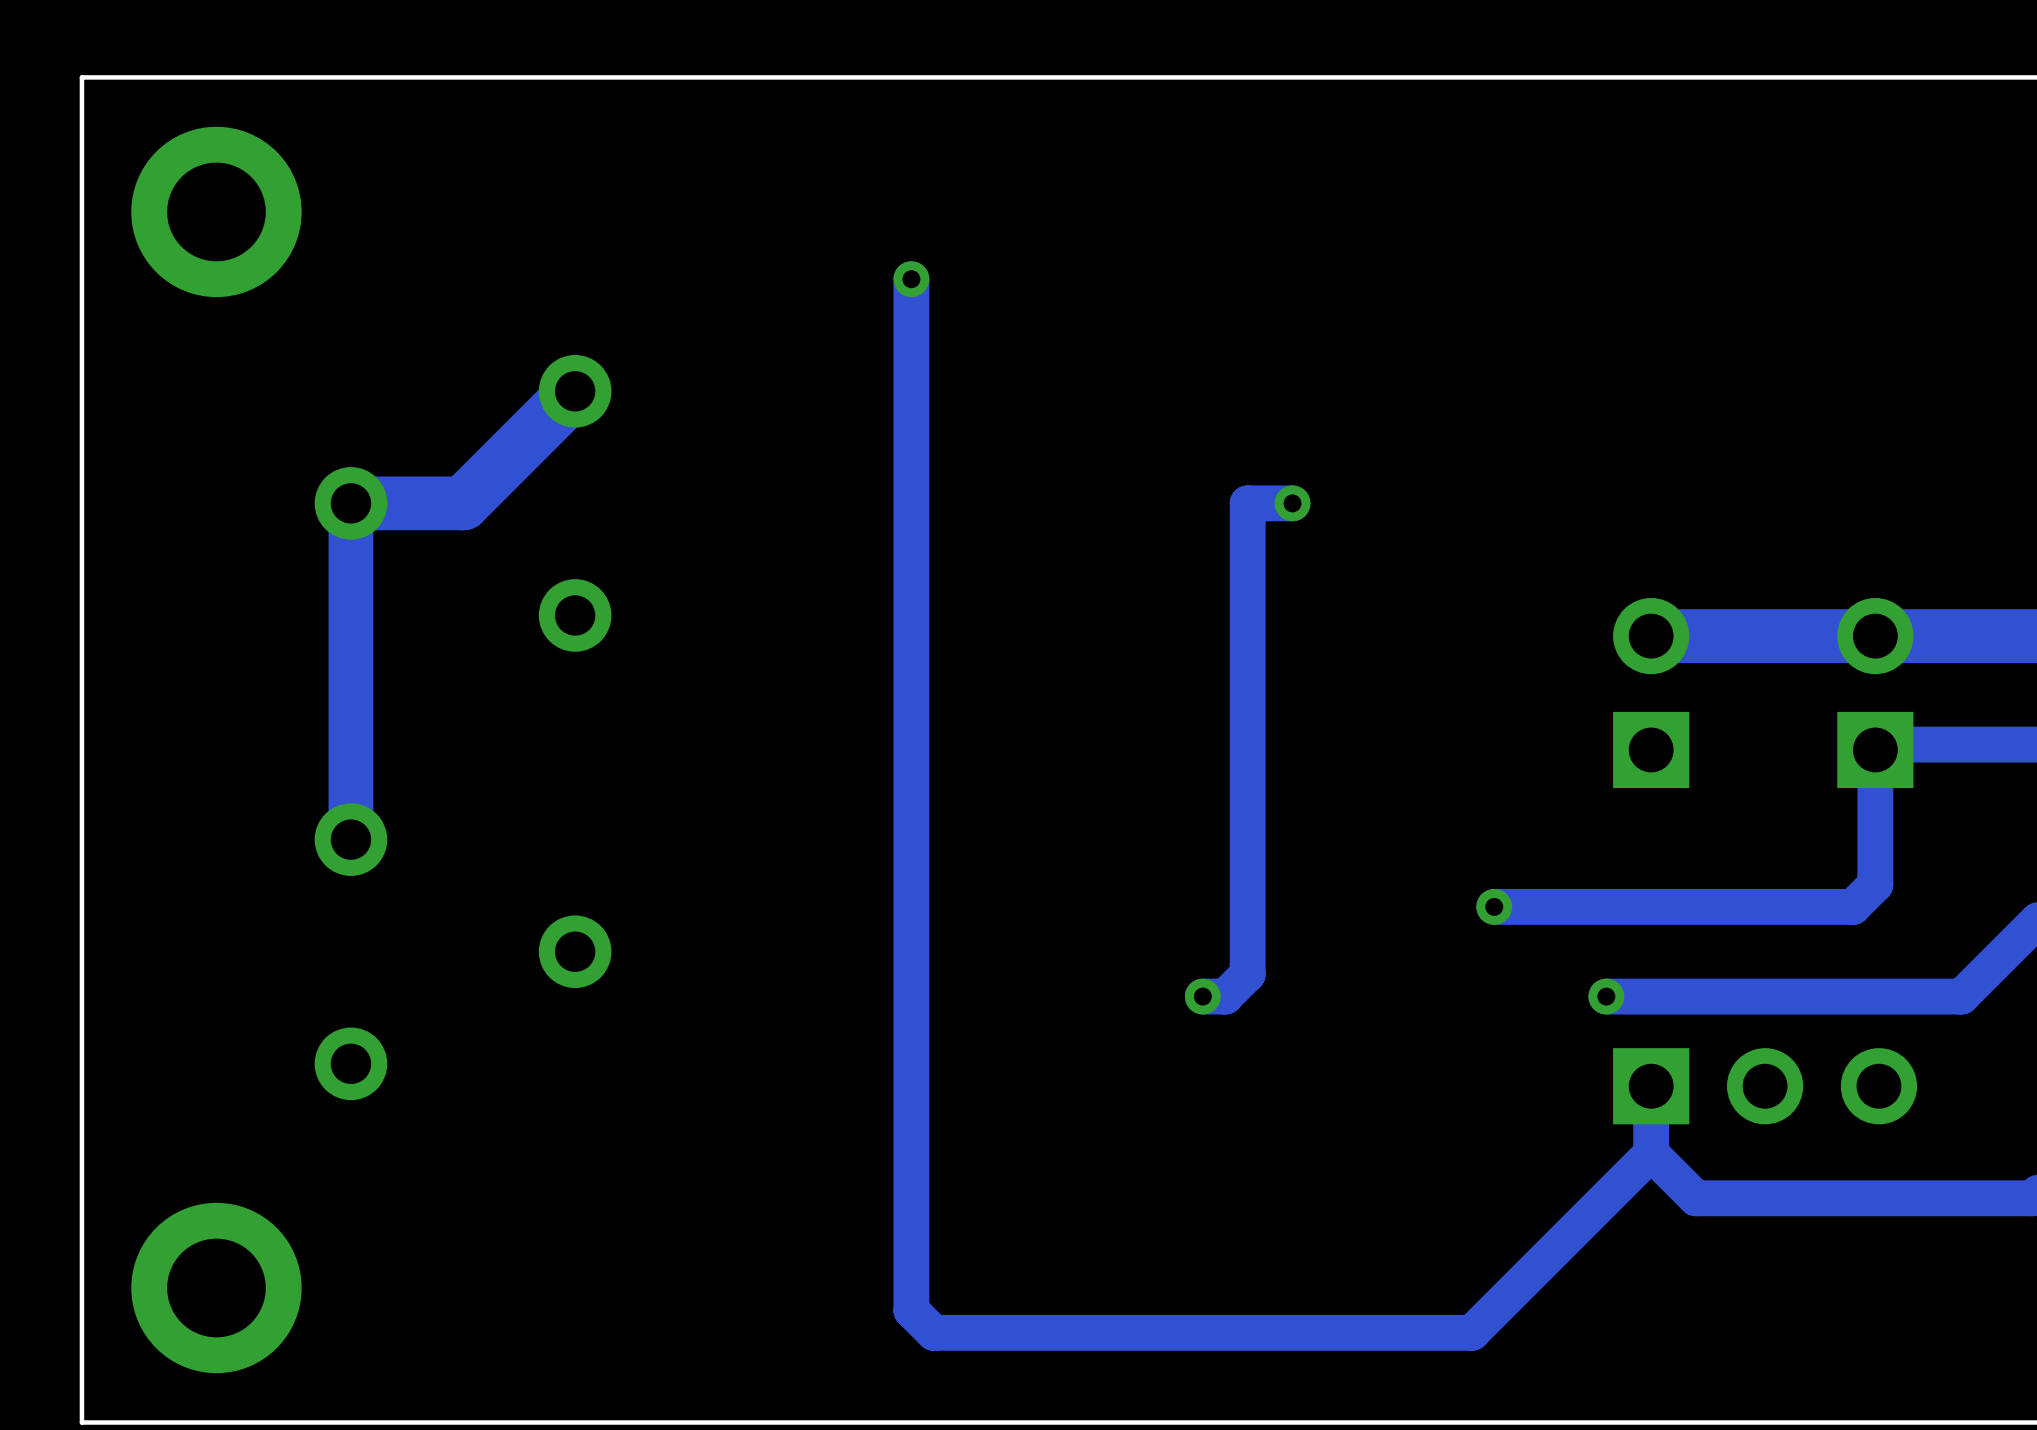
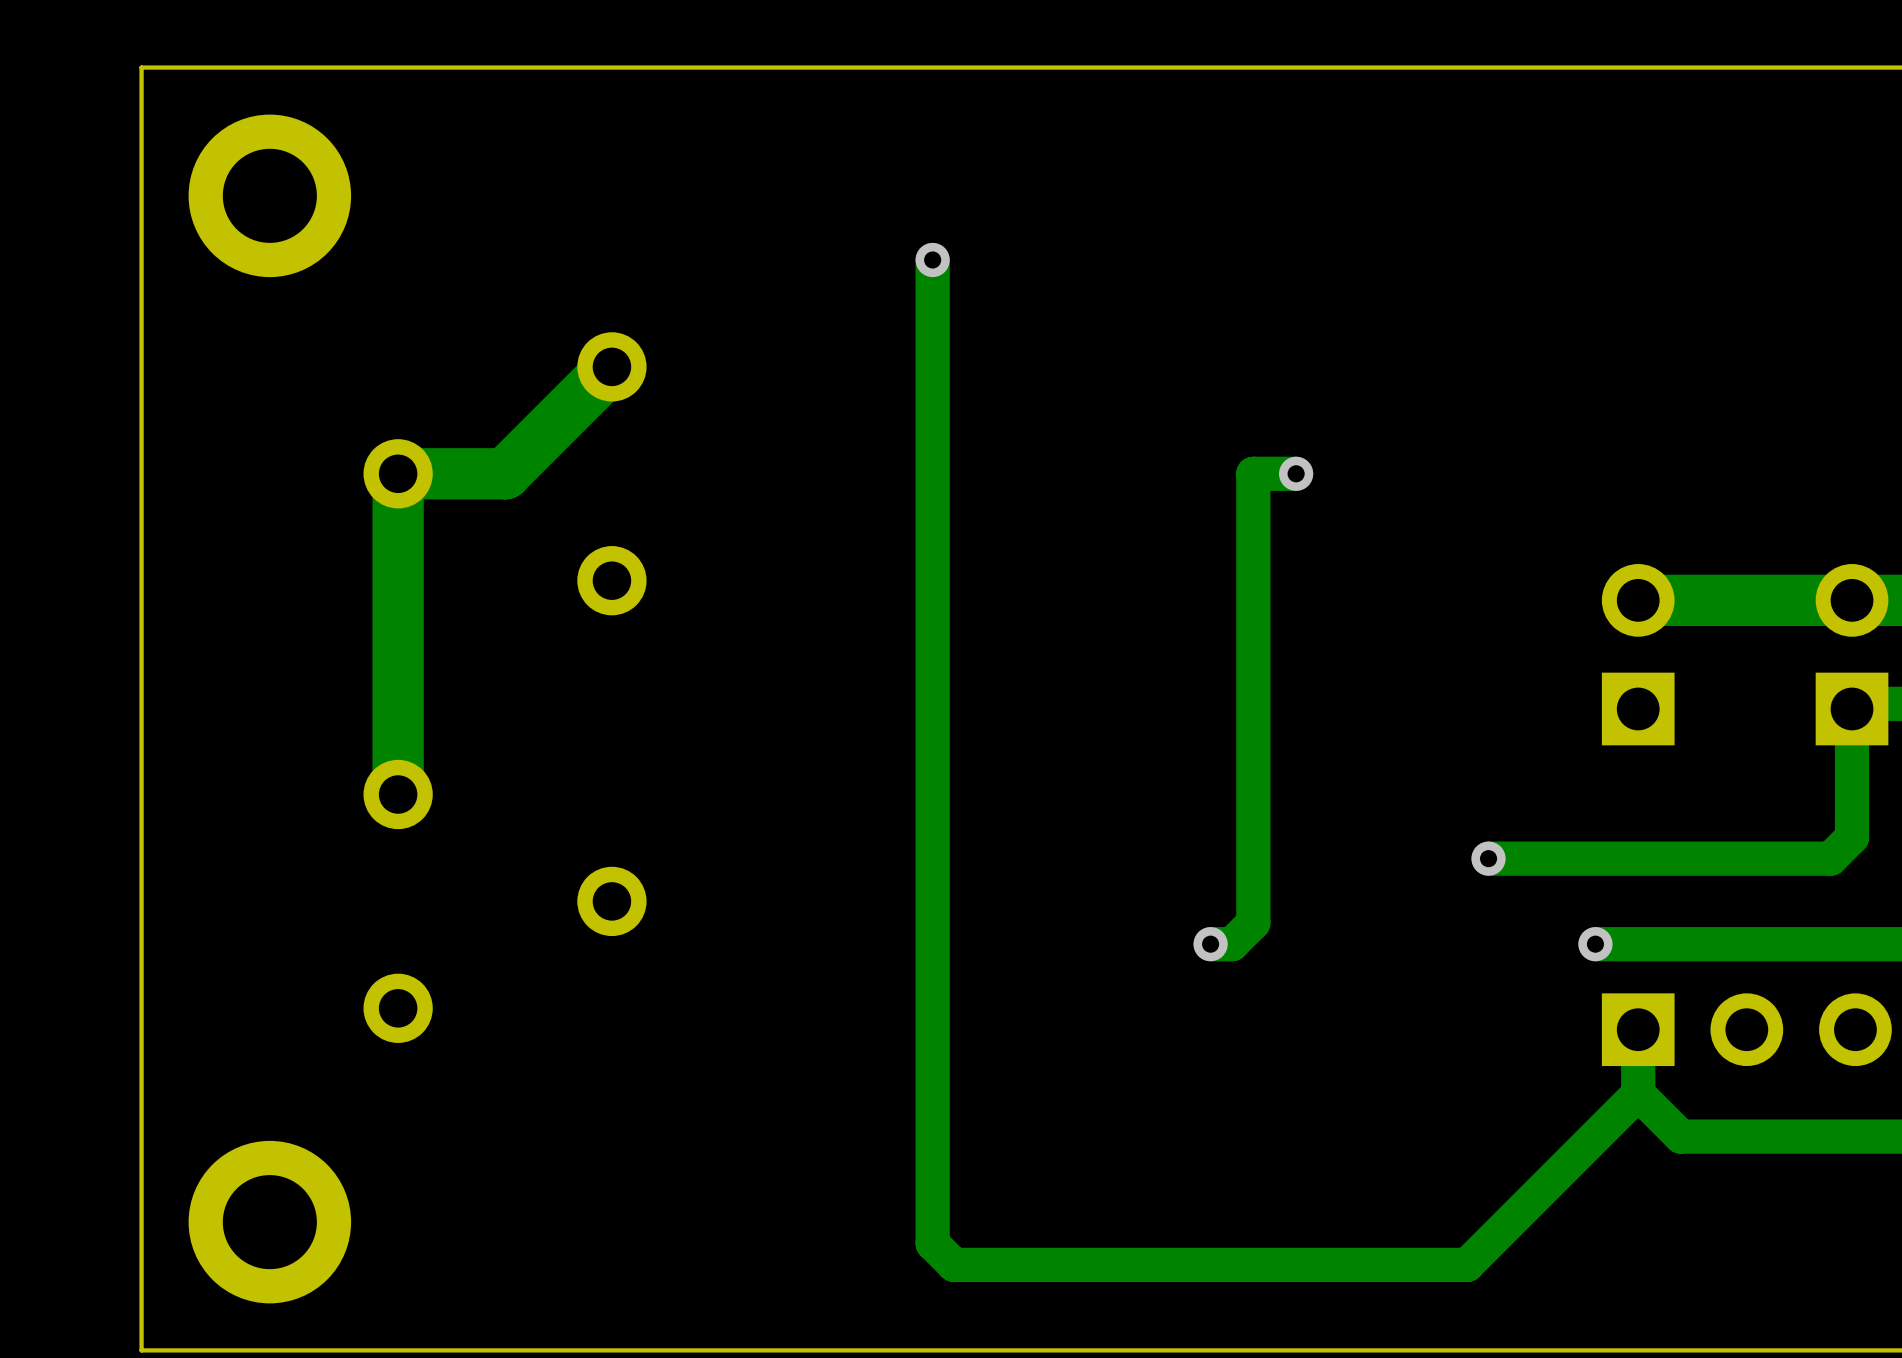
track width: thin (350, 503) (350, 839) -> thick (398, 473) (398, 794)

